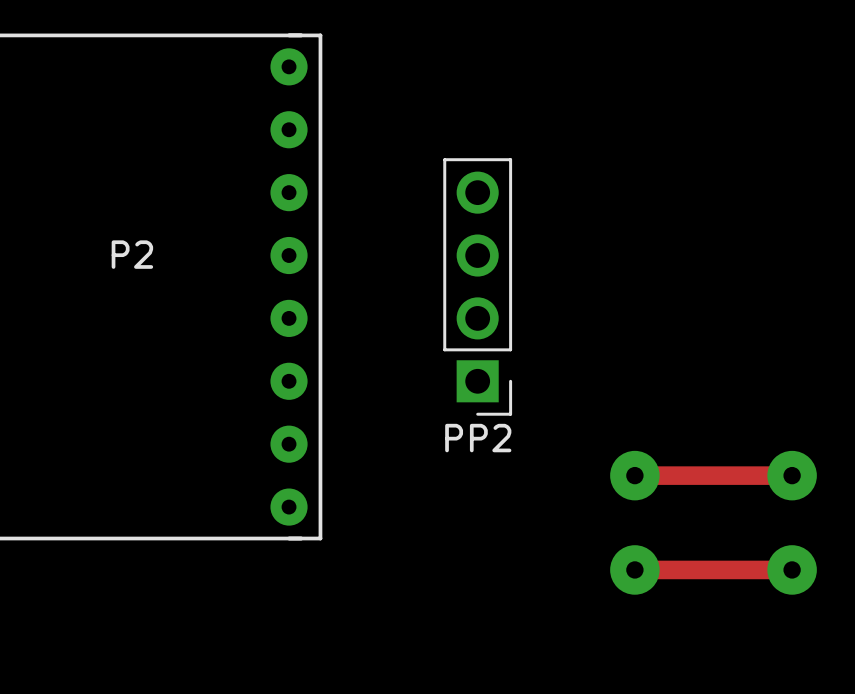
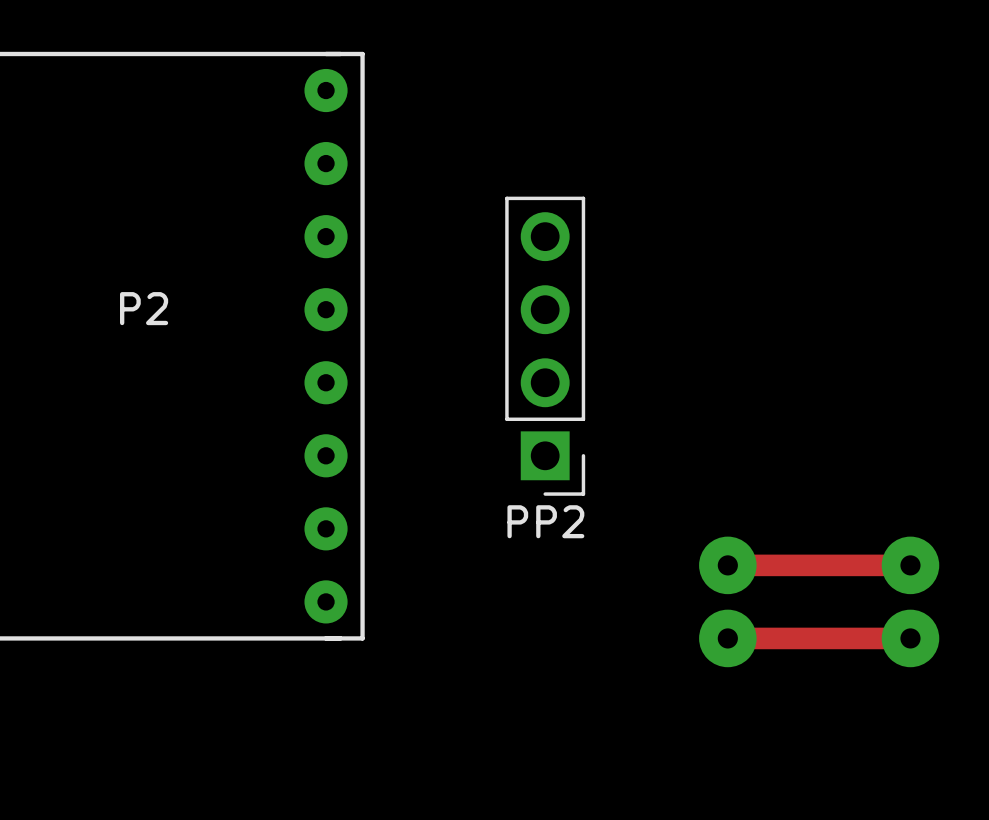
track: (634, 569) (792, 569) -> (727, 638) (910, 638)
via position: (634, 569) -> (727, 638)
via position: (792, 569) -> (910, 638)

